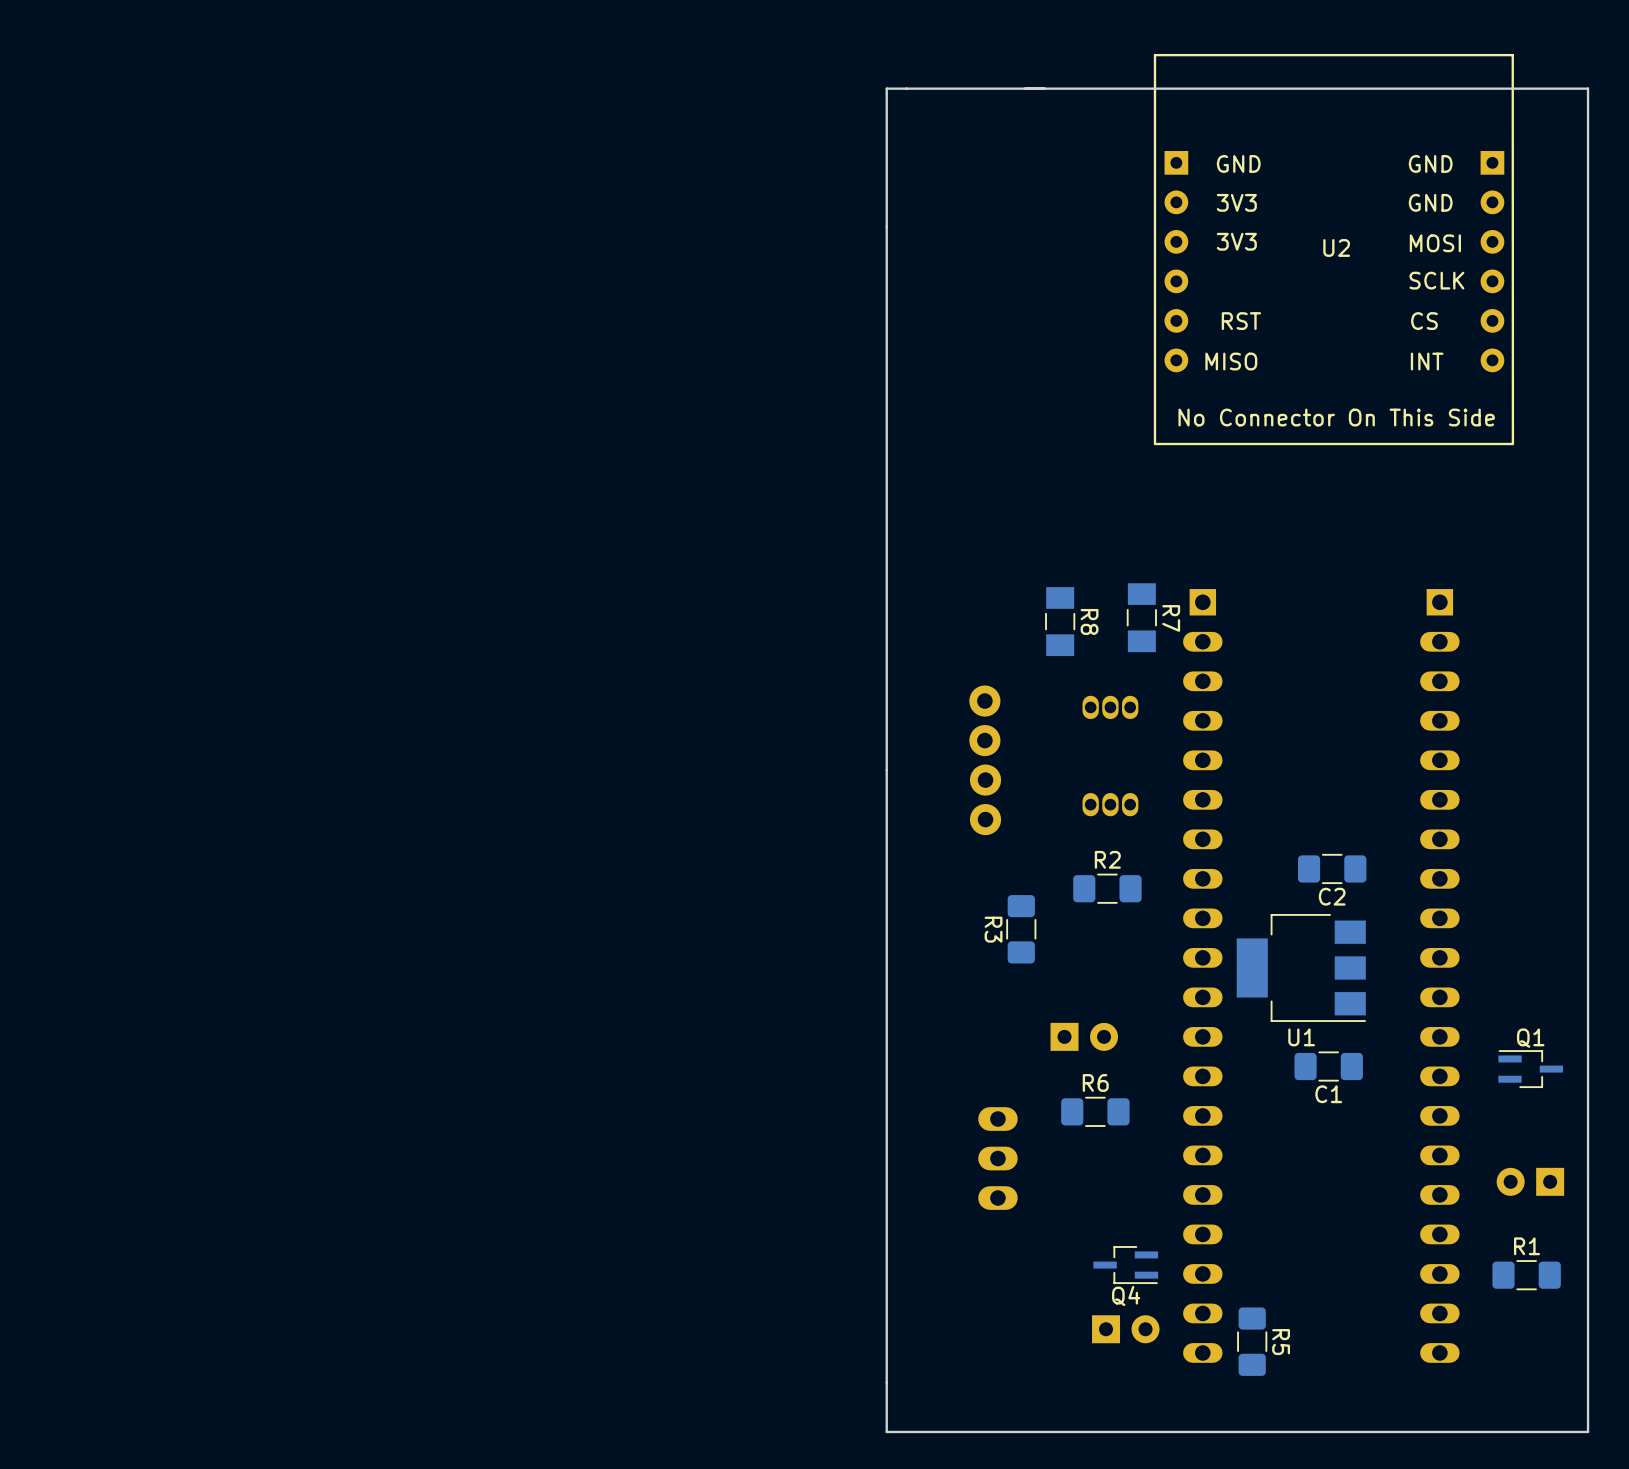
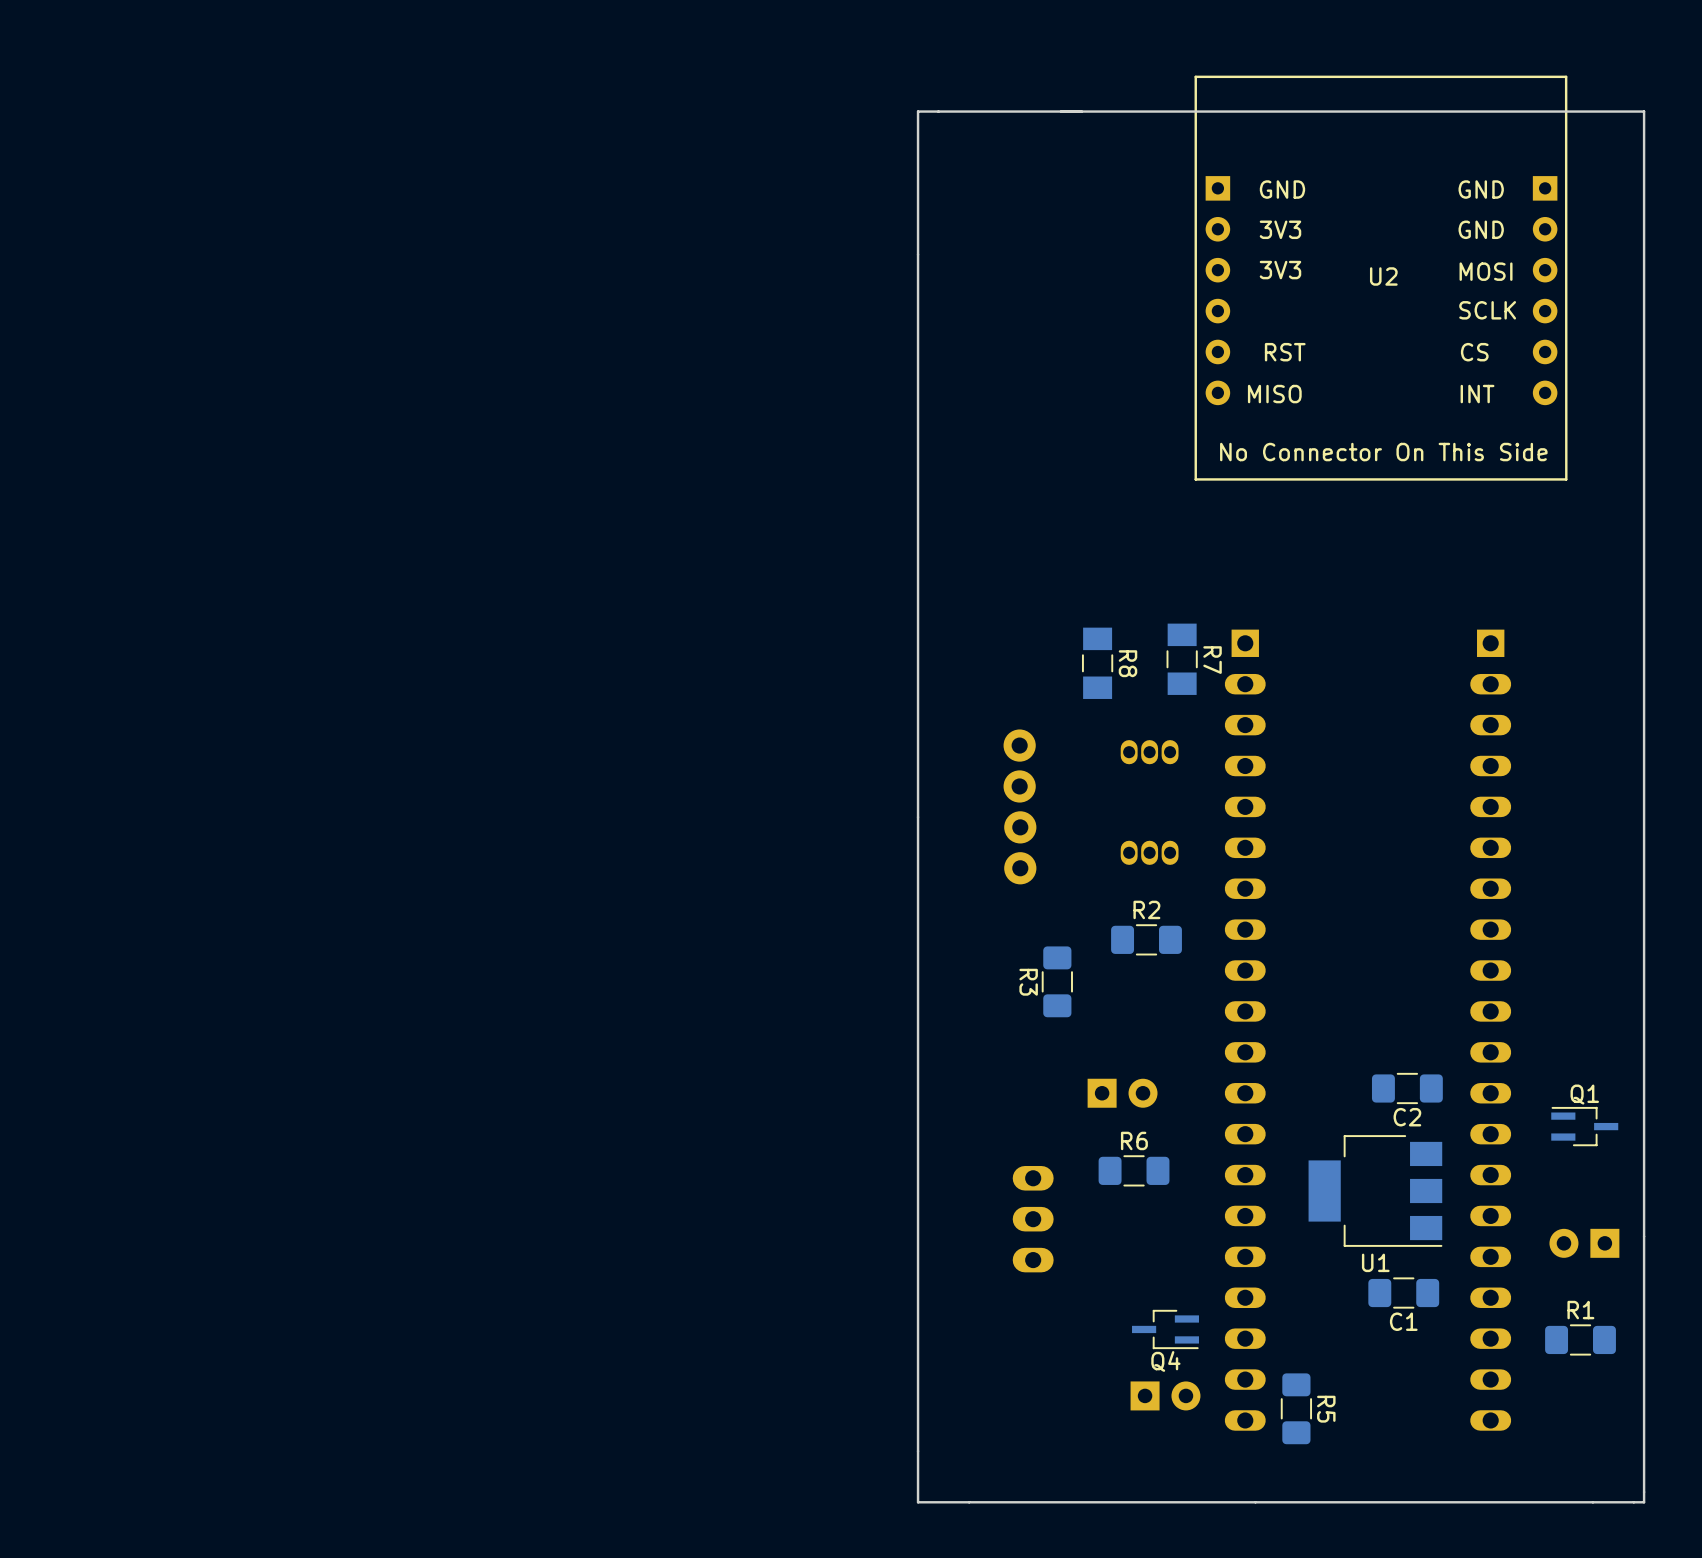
C2 position: (1332, 868) -> (1407, 1088)
U1 position: (1301, 967) -> (1375, 1190)
C1 position: (1328, 1066) -> (1403, 1293)

